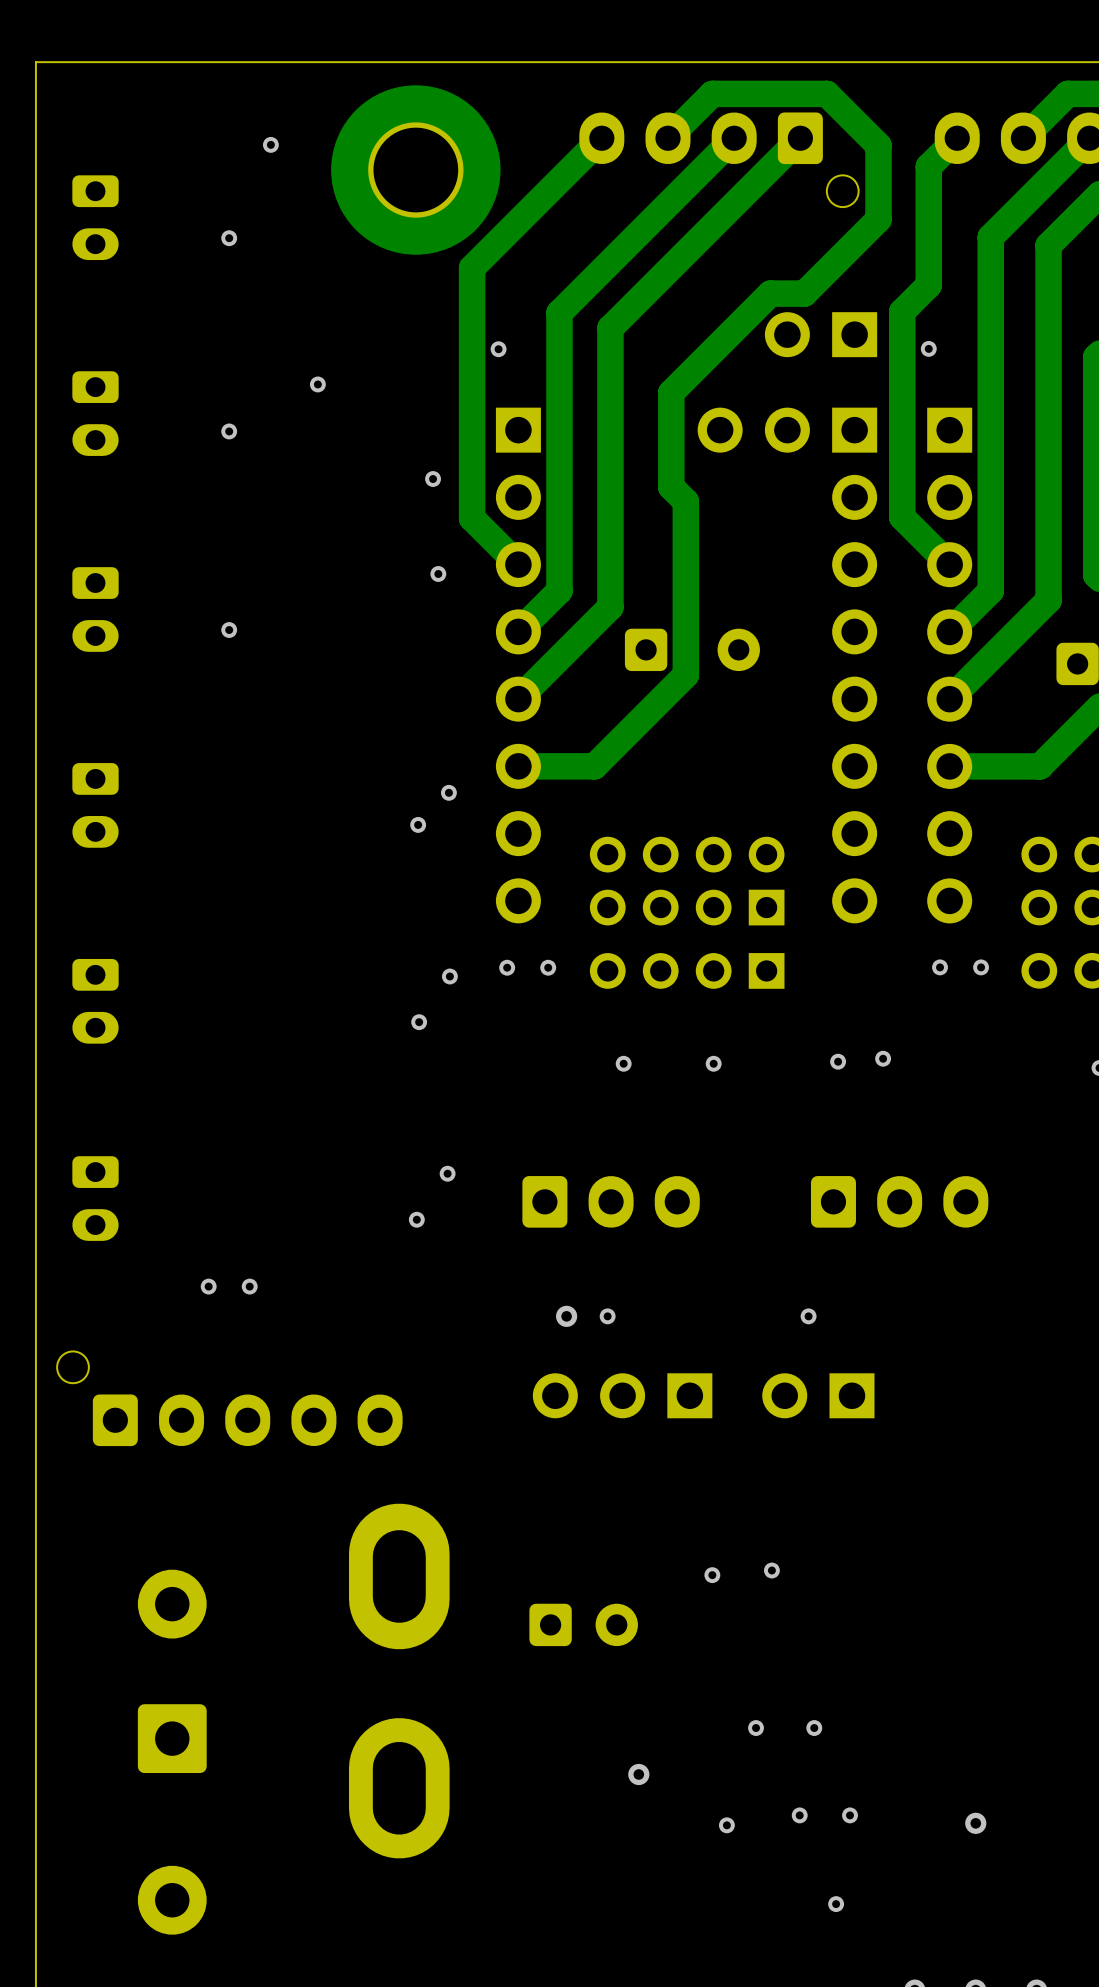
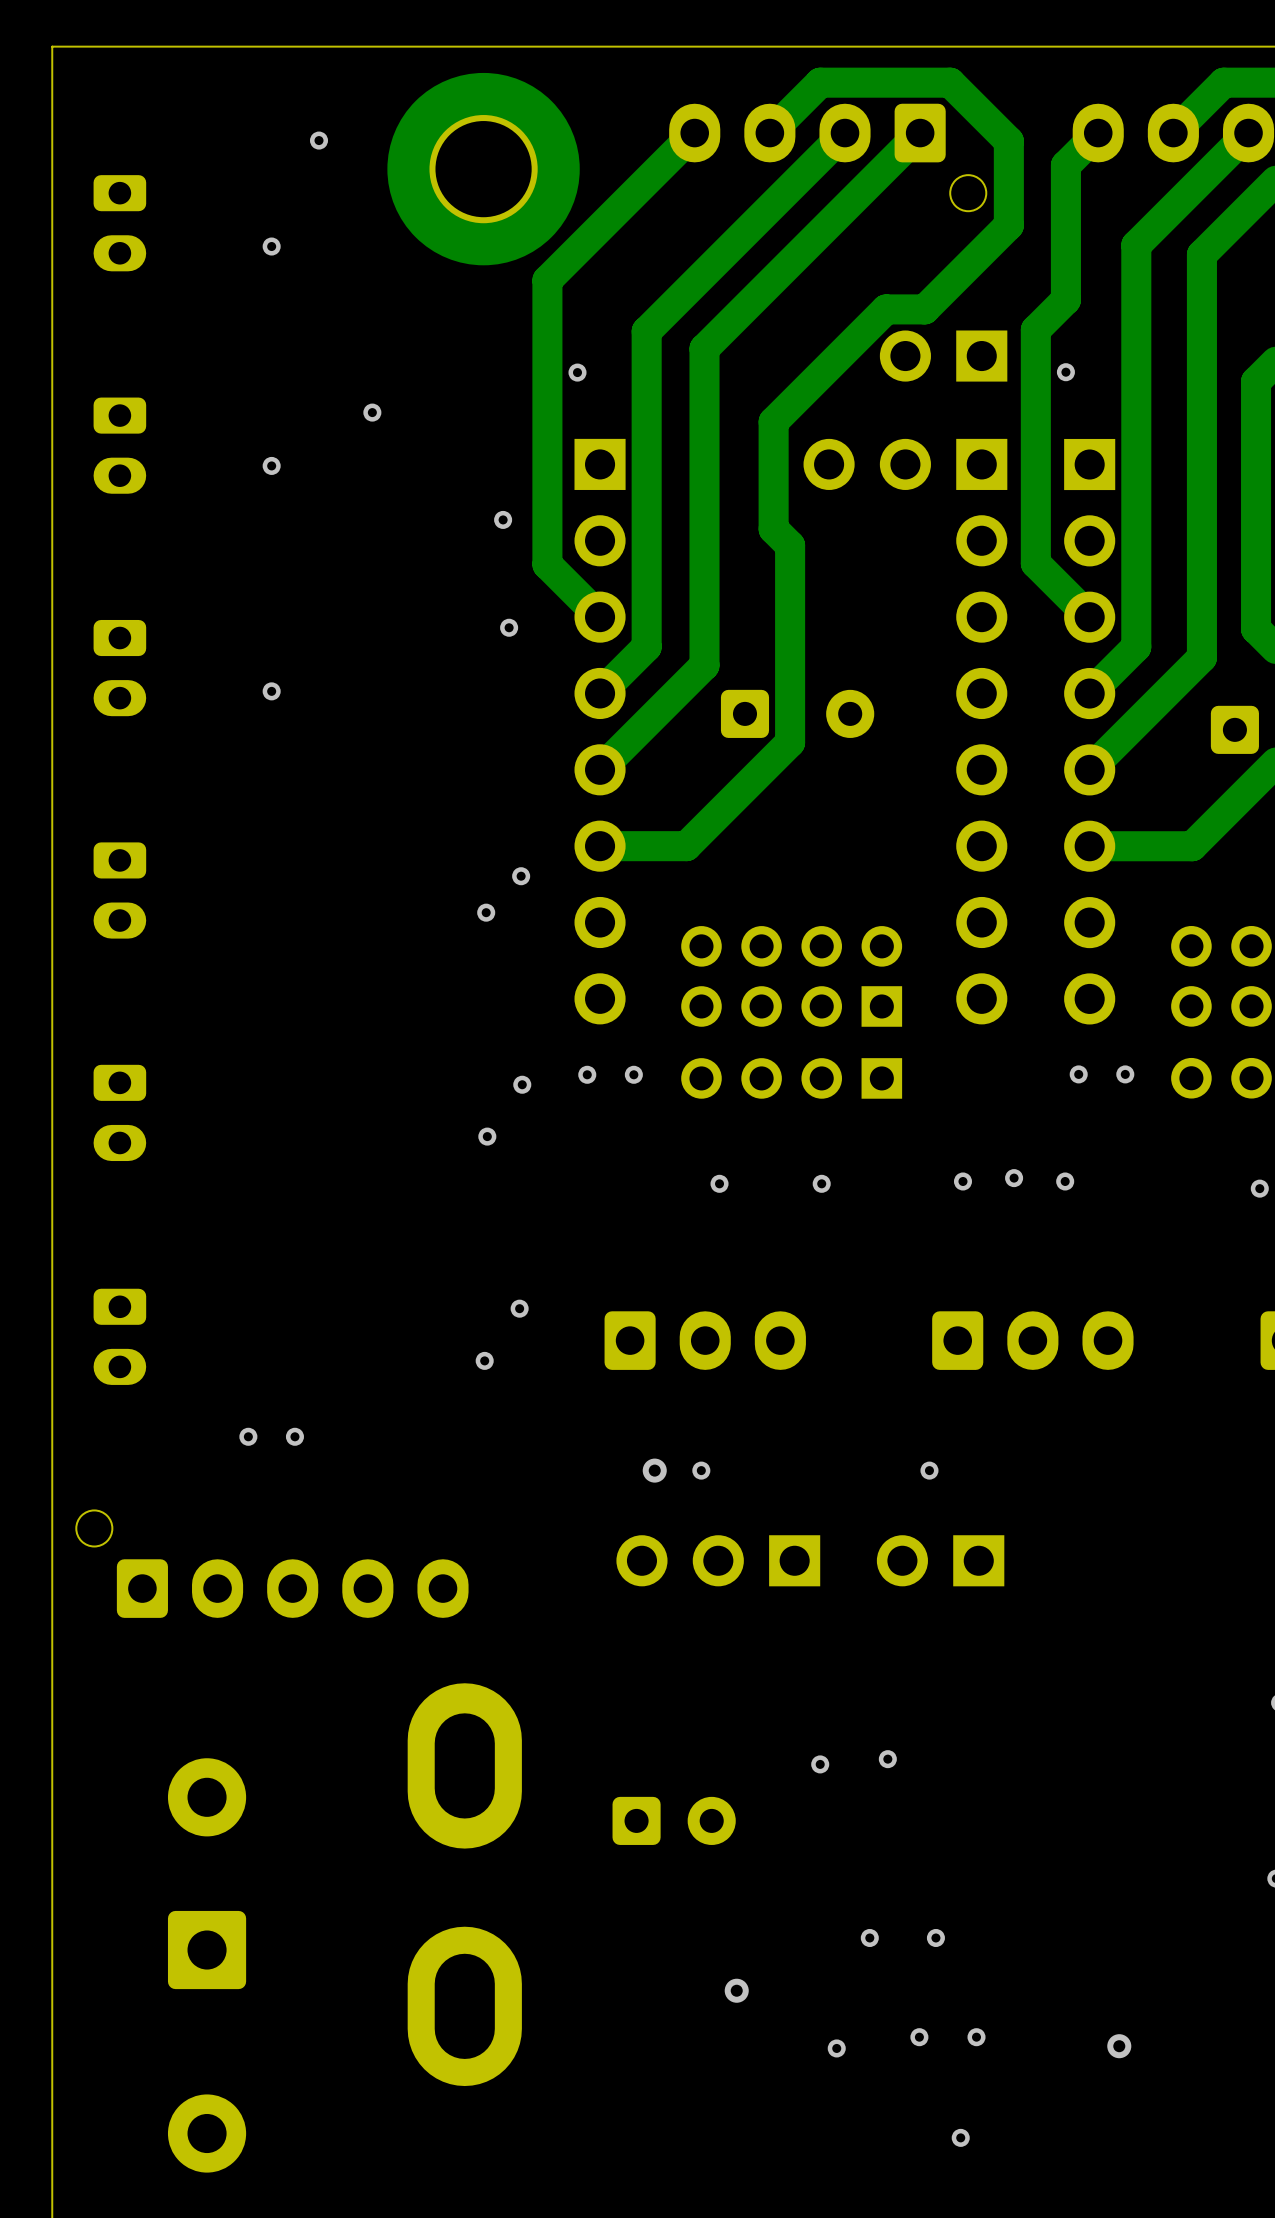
via: none -> (1065, 1181)

